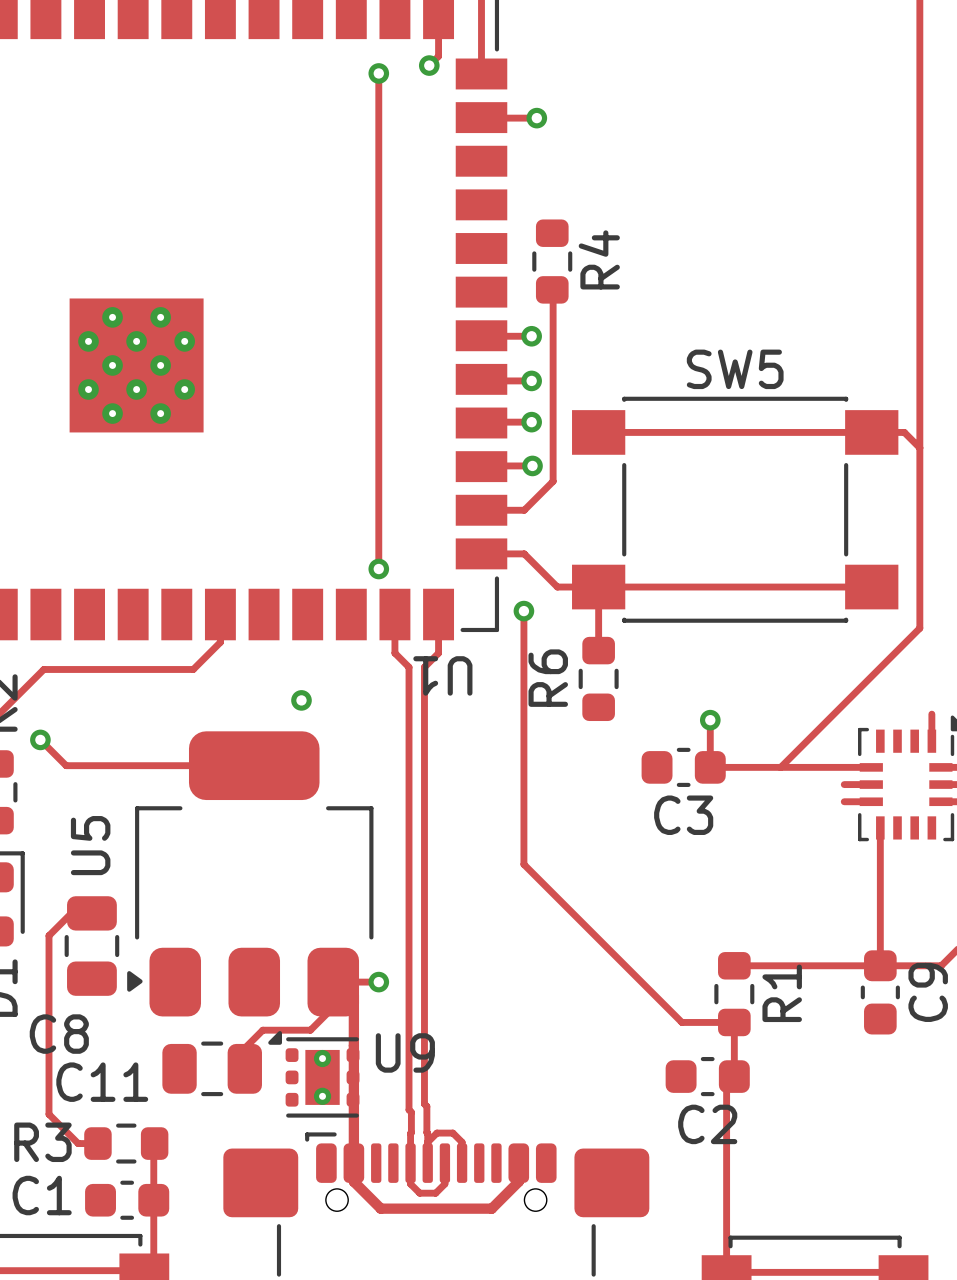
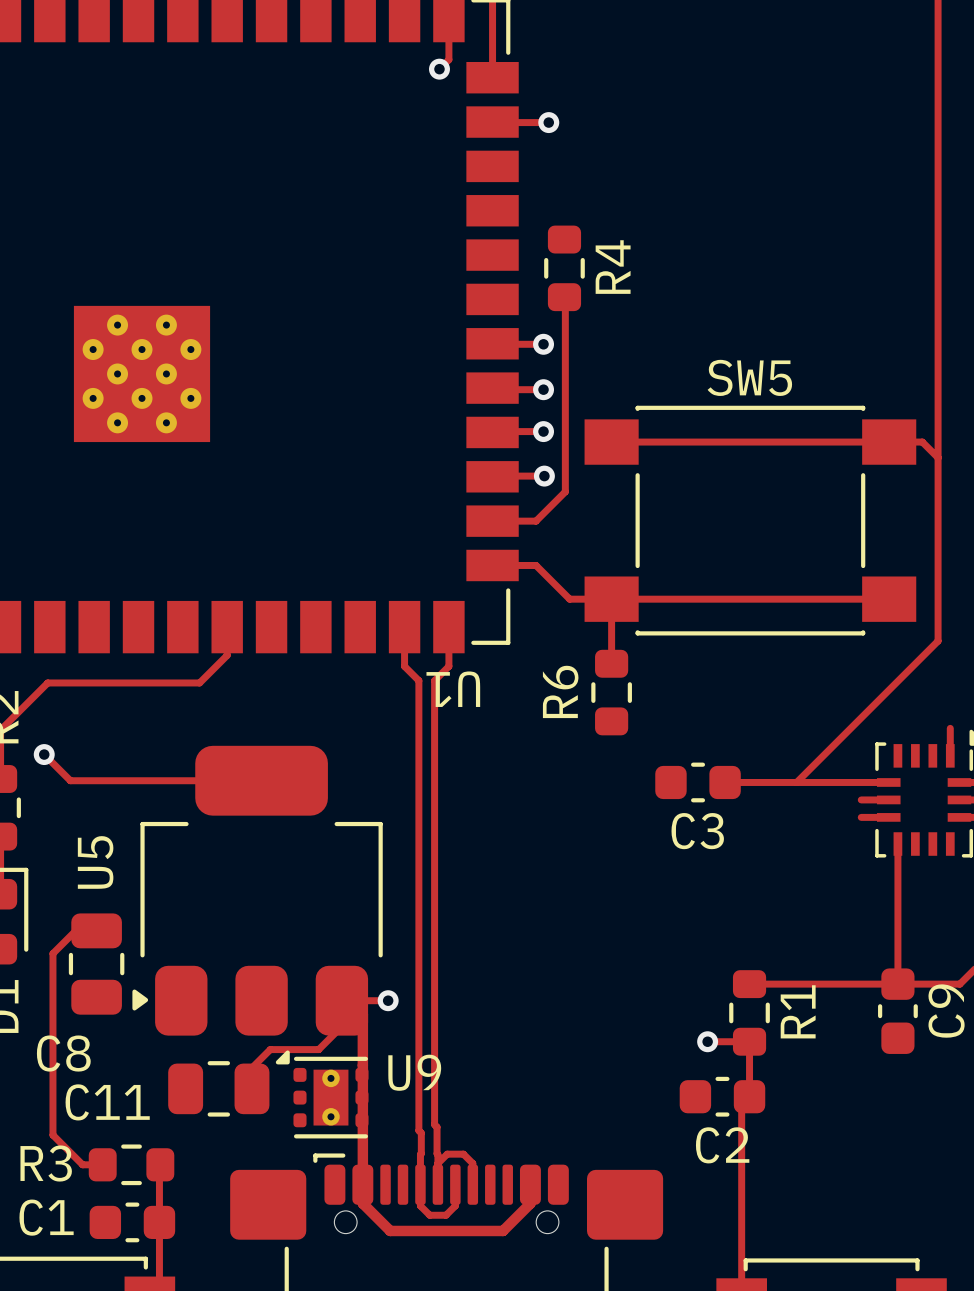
track: (378, 73) (378, 569) (377, 567) -> none
via: (378, 73) -> none
via: (378, 569) -> none
track: (523, 611) (523, 864) (681, 1022) (690, 1022) -> none
via: (523, 611) -> none
via: (301, 700) -> none
track: (710, 720) (710, 767) -> none
via: (710, 720) -> none
via: none -> (707, 1041)

